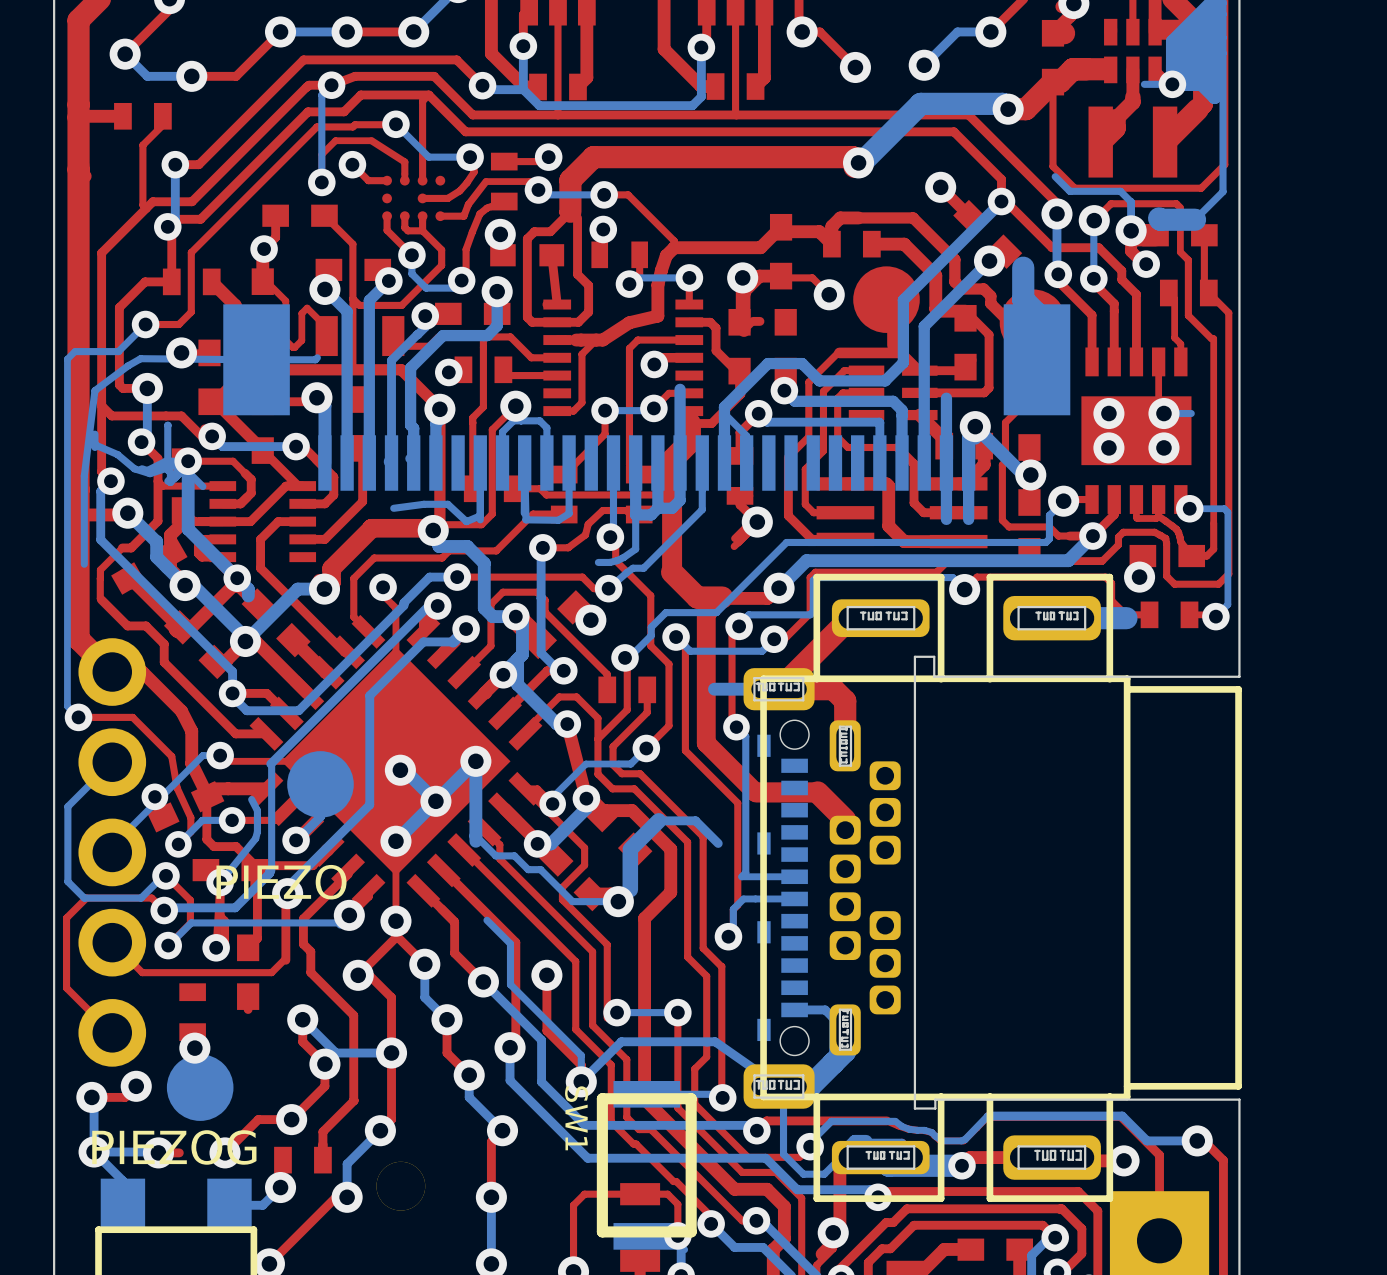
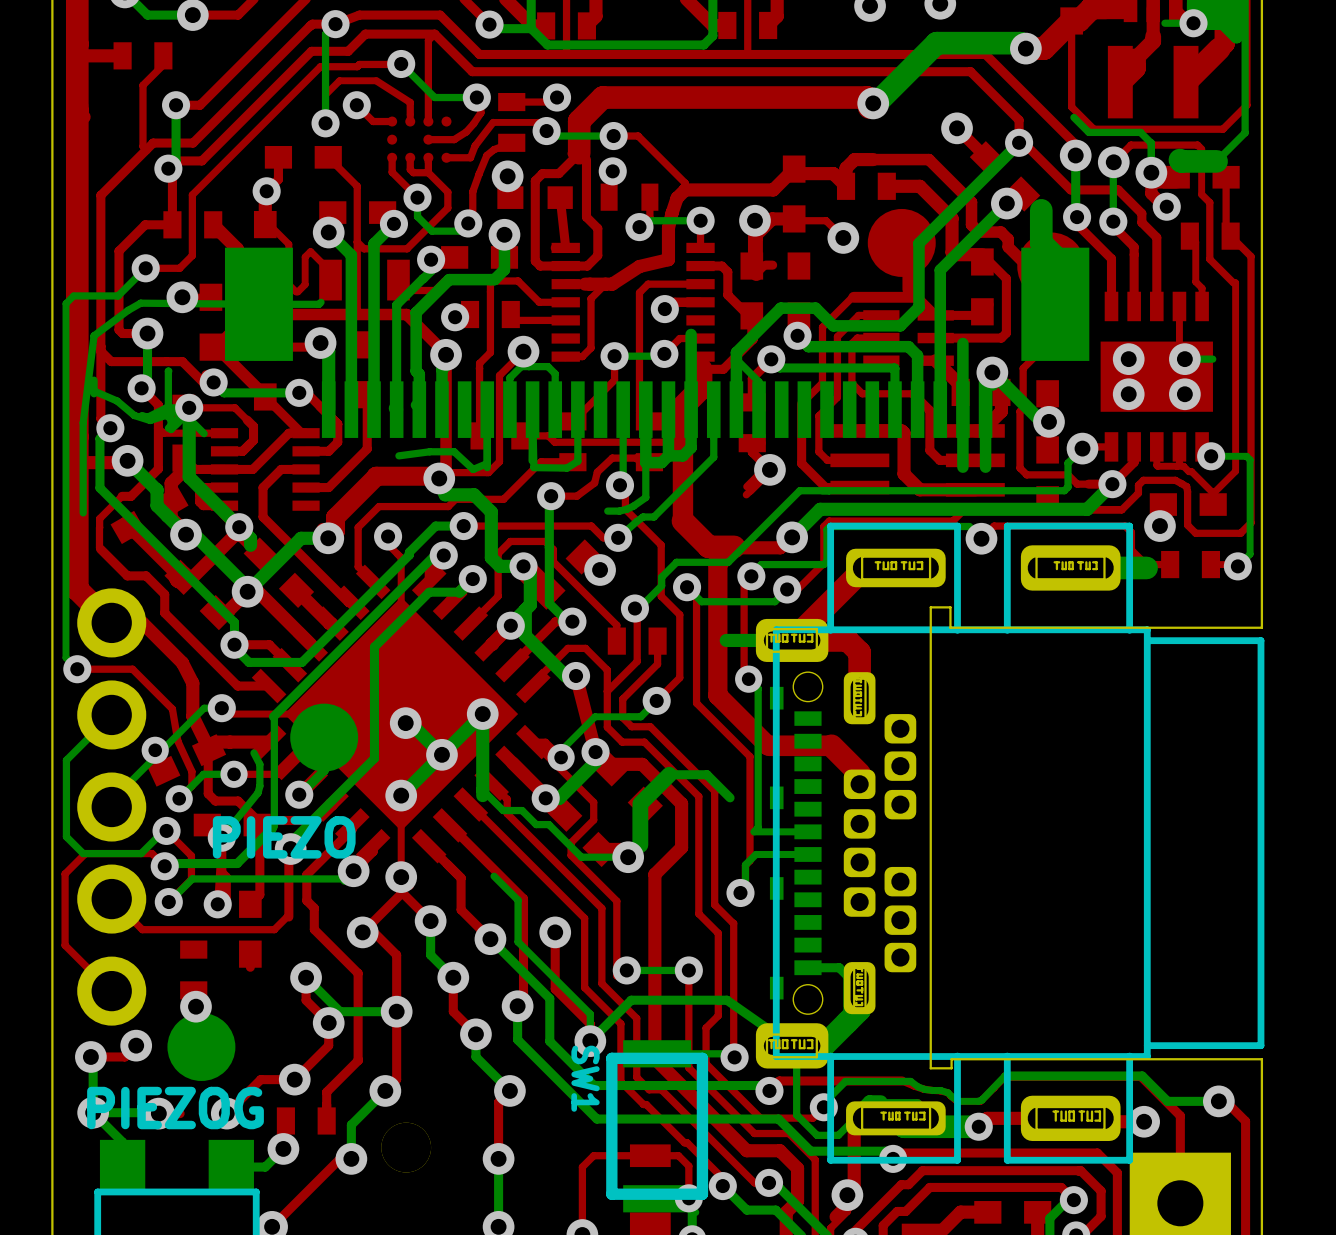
top track: (1158, 516) (1176, 529) (1180, 542) (1191, 556) (1206, 556) (1213, 549) (1213, 523) -> (1213, 493) (1235, 471)
top track: none -> (1177, 466) (1183, 466) (1188, 471) (1191, 471) (1213, 493) (1213, 504)

